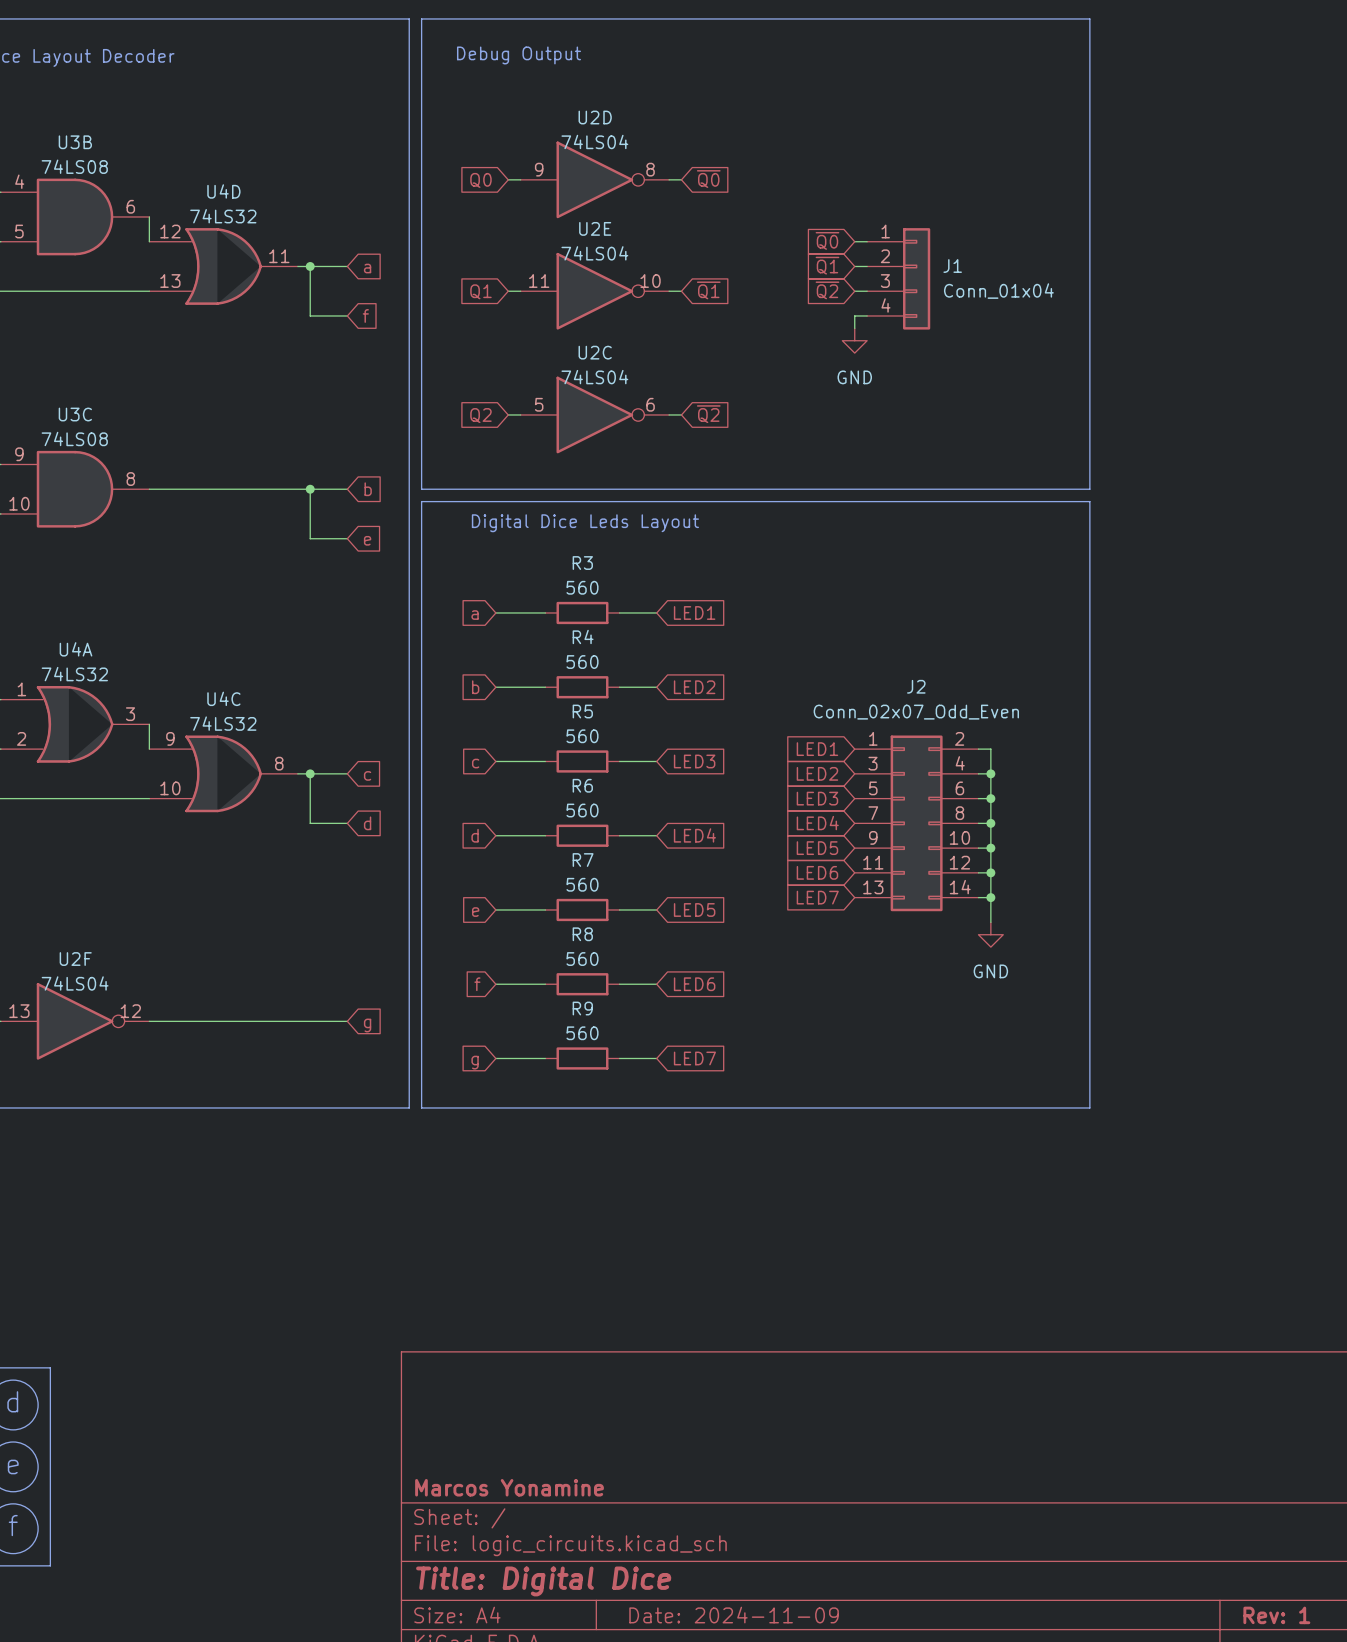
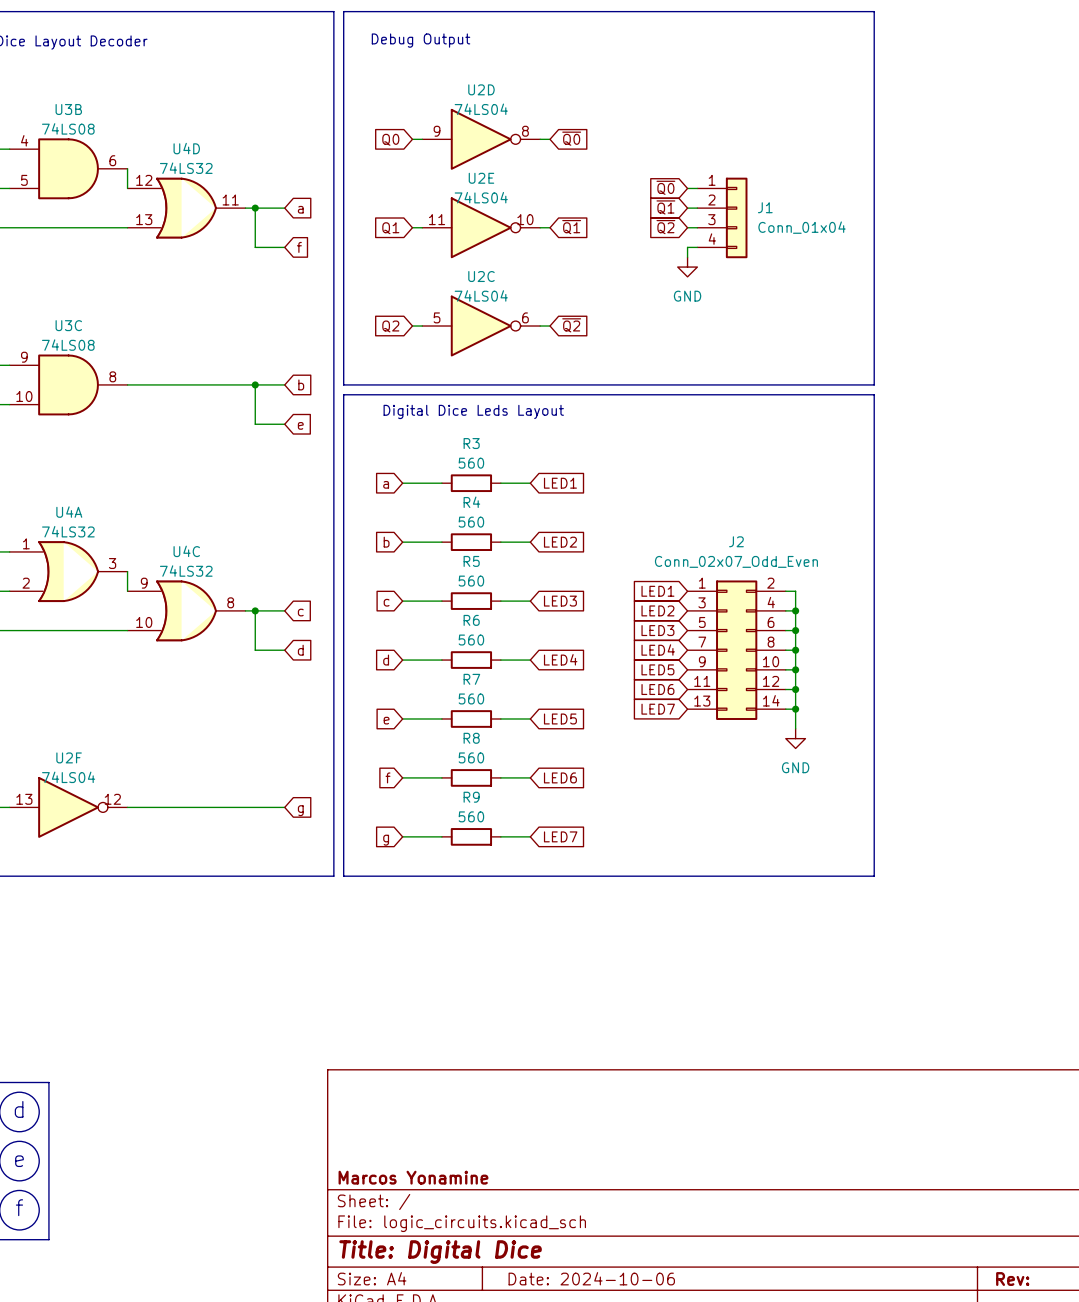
title block: Date: 2024-11-09 (734, 1615) -> Date: 2024-10-06 (591, 1278)
title block: Rev: 1 (1276, 1615) -> Rev: (1012, 1279)

